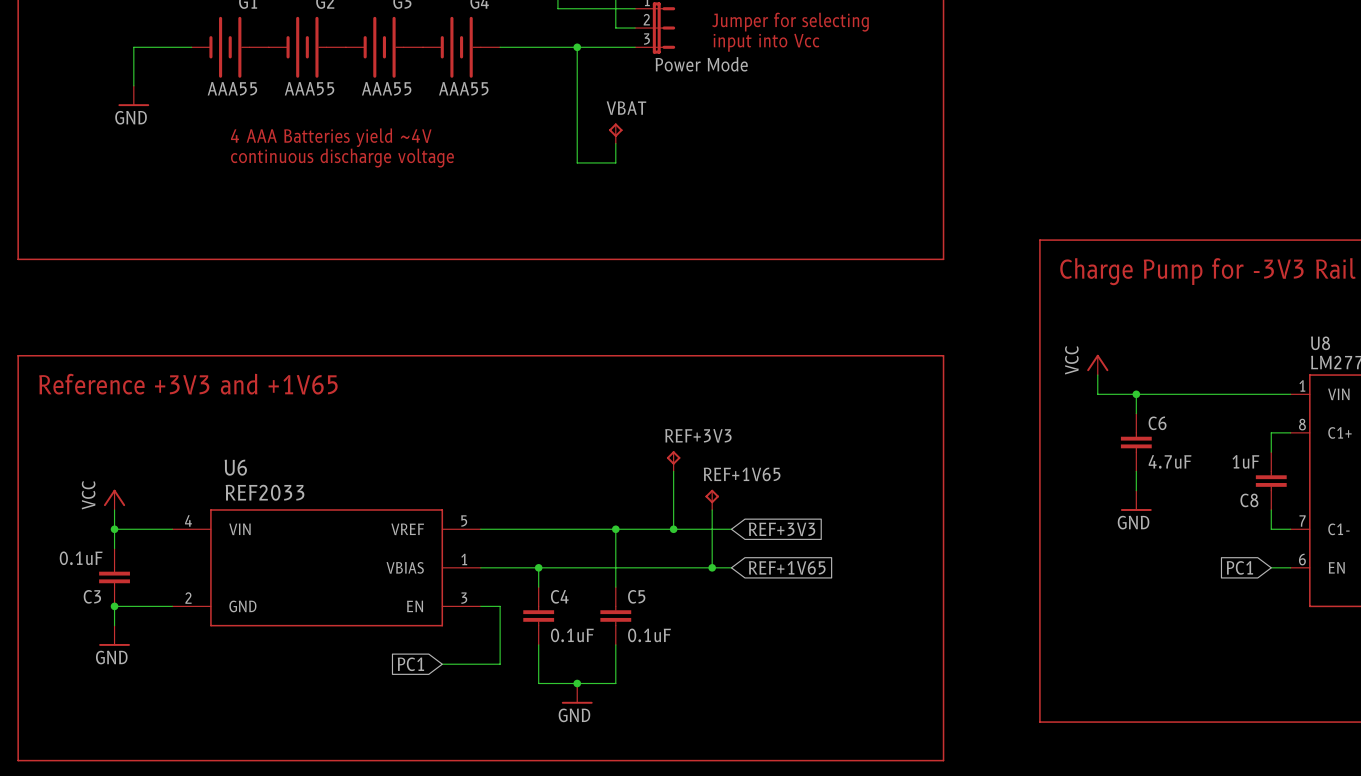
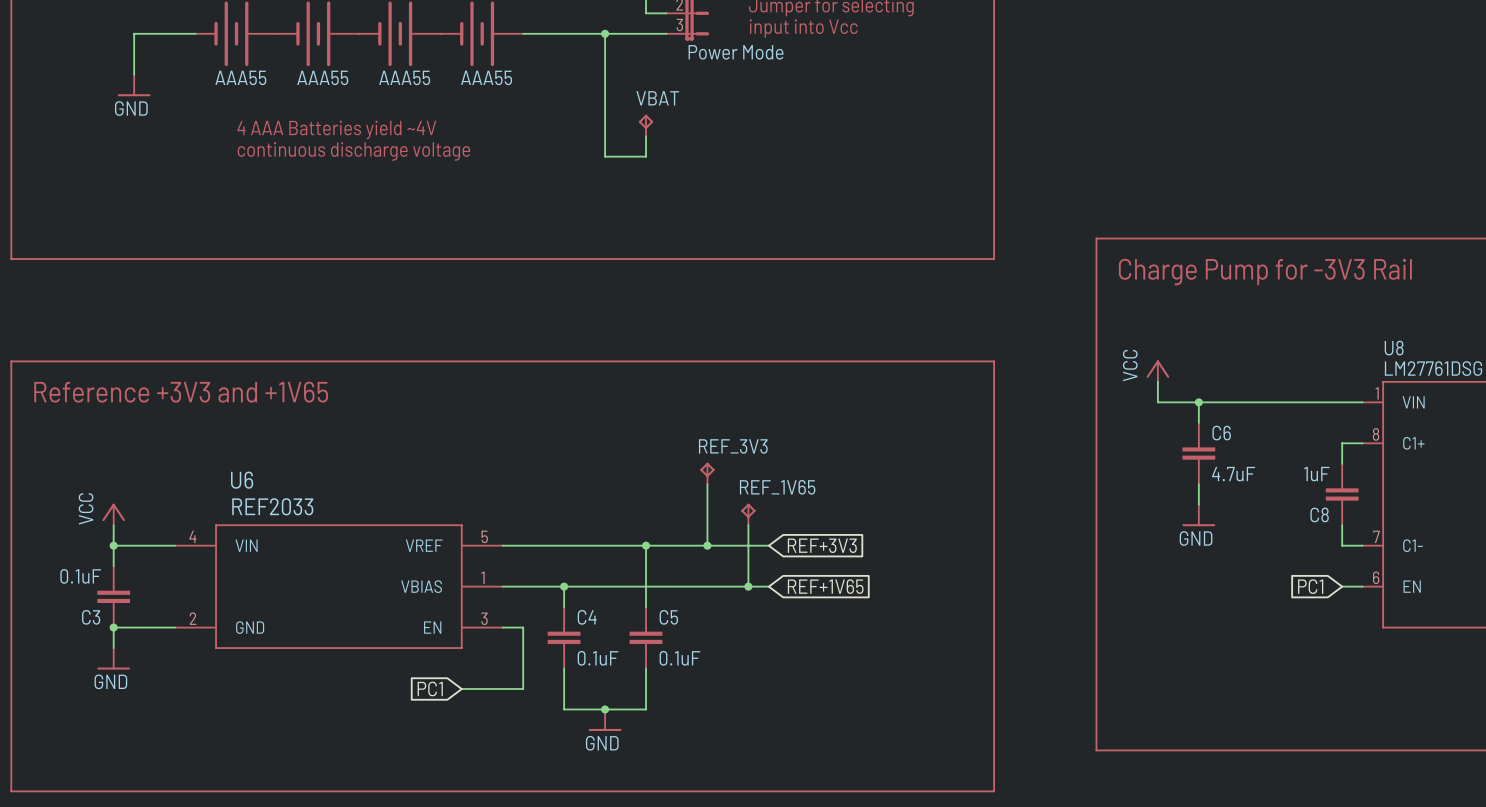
REF+3V3 name: REF+3V3 (698, 435) -> REF_3V3 (733, 446)
REF+1V65 name: REF+1V65 (742, 474) -> REF_1V65 (777, 487)

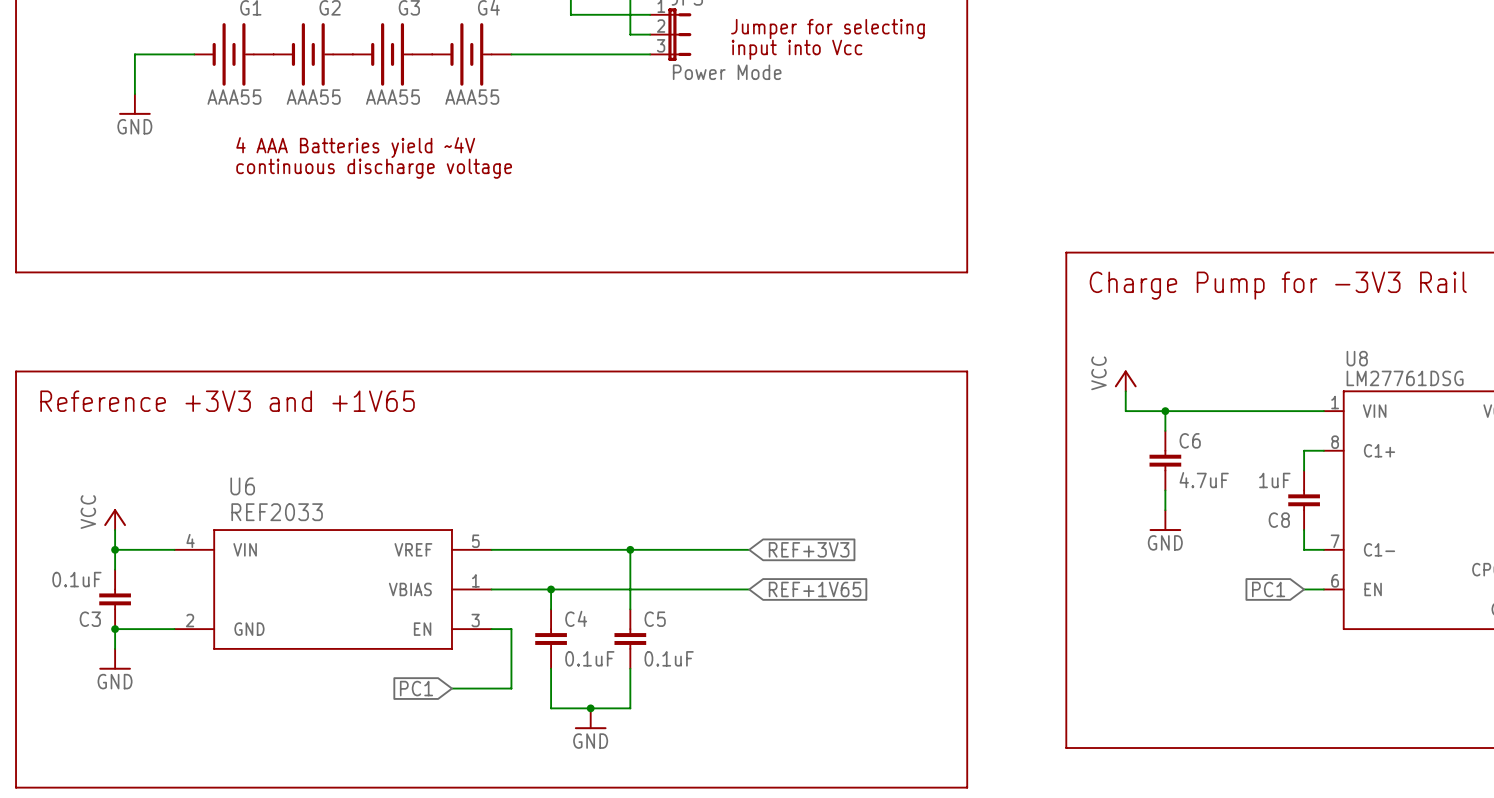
wire: (605, 33) (605, 156) (646, 156) (646, 136) -> none
junction: (605, 33) -> none
VBAT: (646, 125) -> none
REF_3V3: (707, 473) -> none
wire: (707, 484) (707, 545) -> none
REF_1V65: (748, 514) -> none
wire: (748, 525) (748, 586) -> none
junction: (707, 545) -> none
junction: (748, 586) -> none

